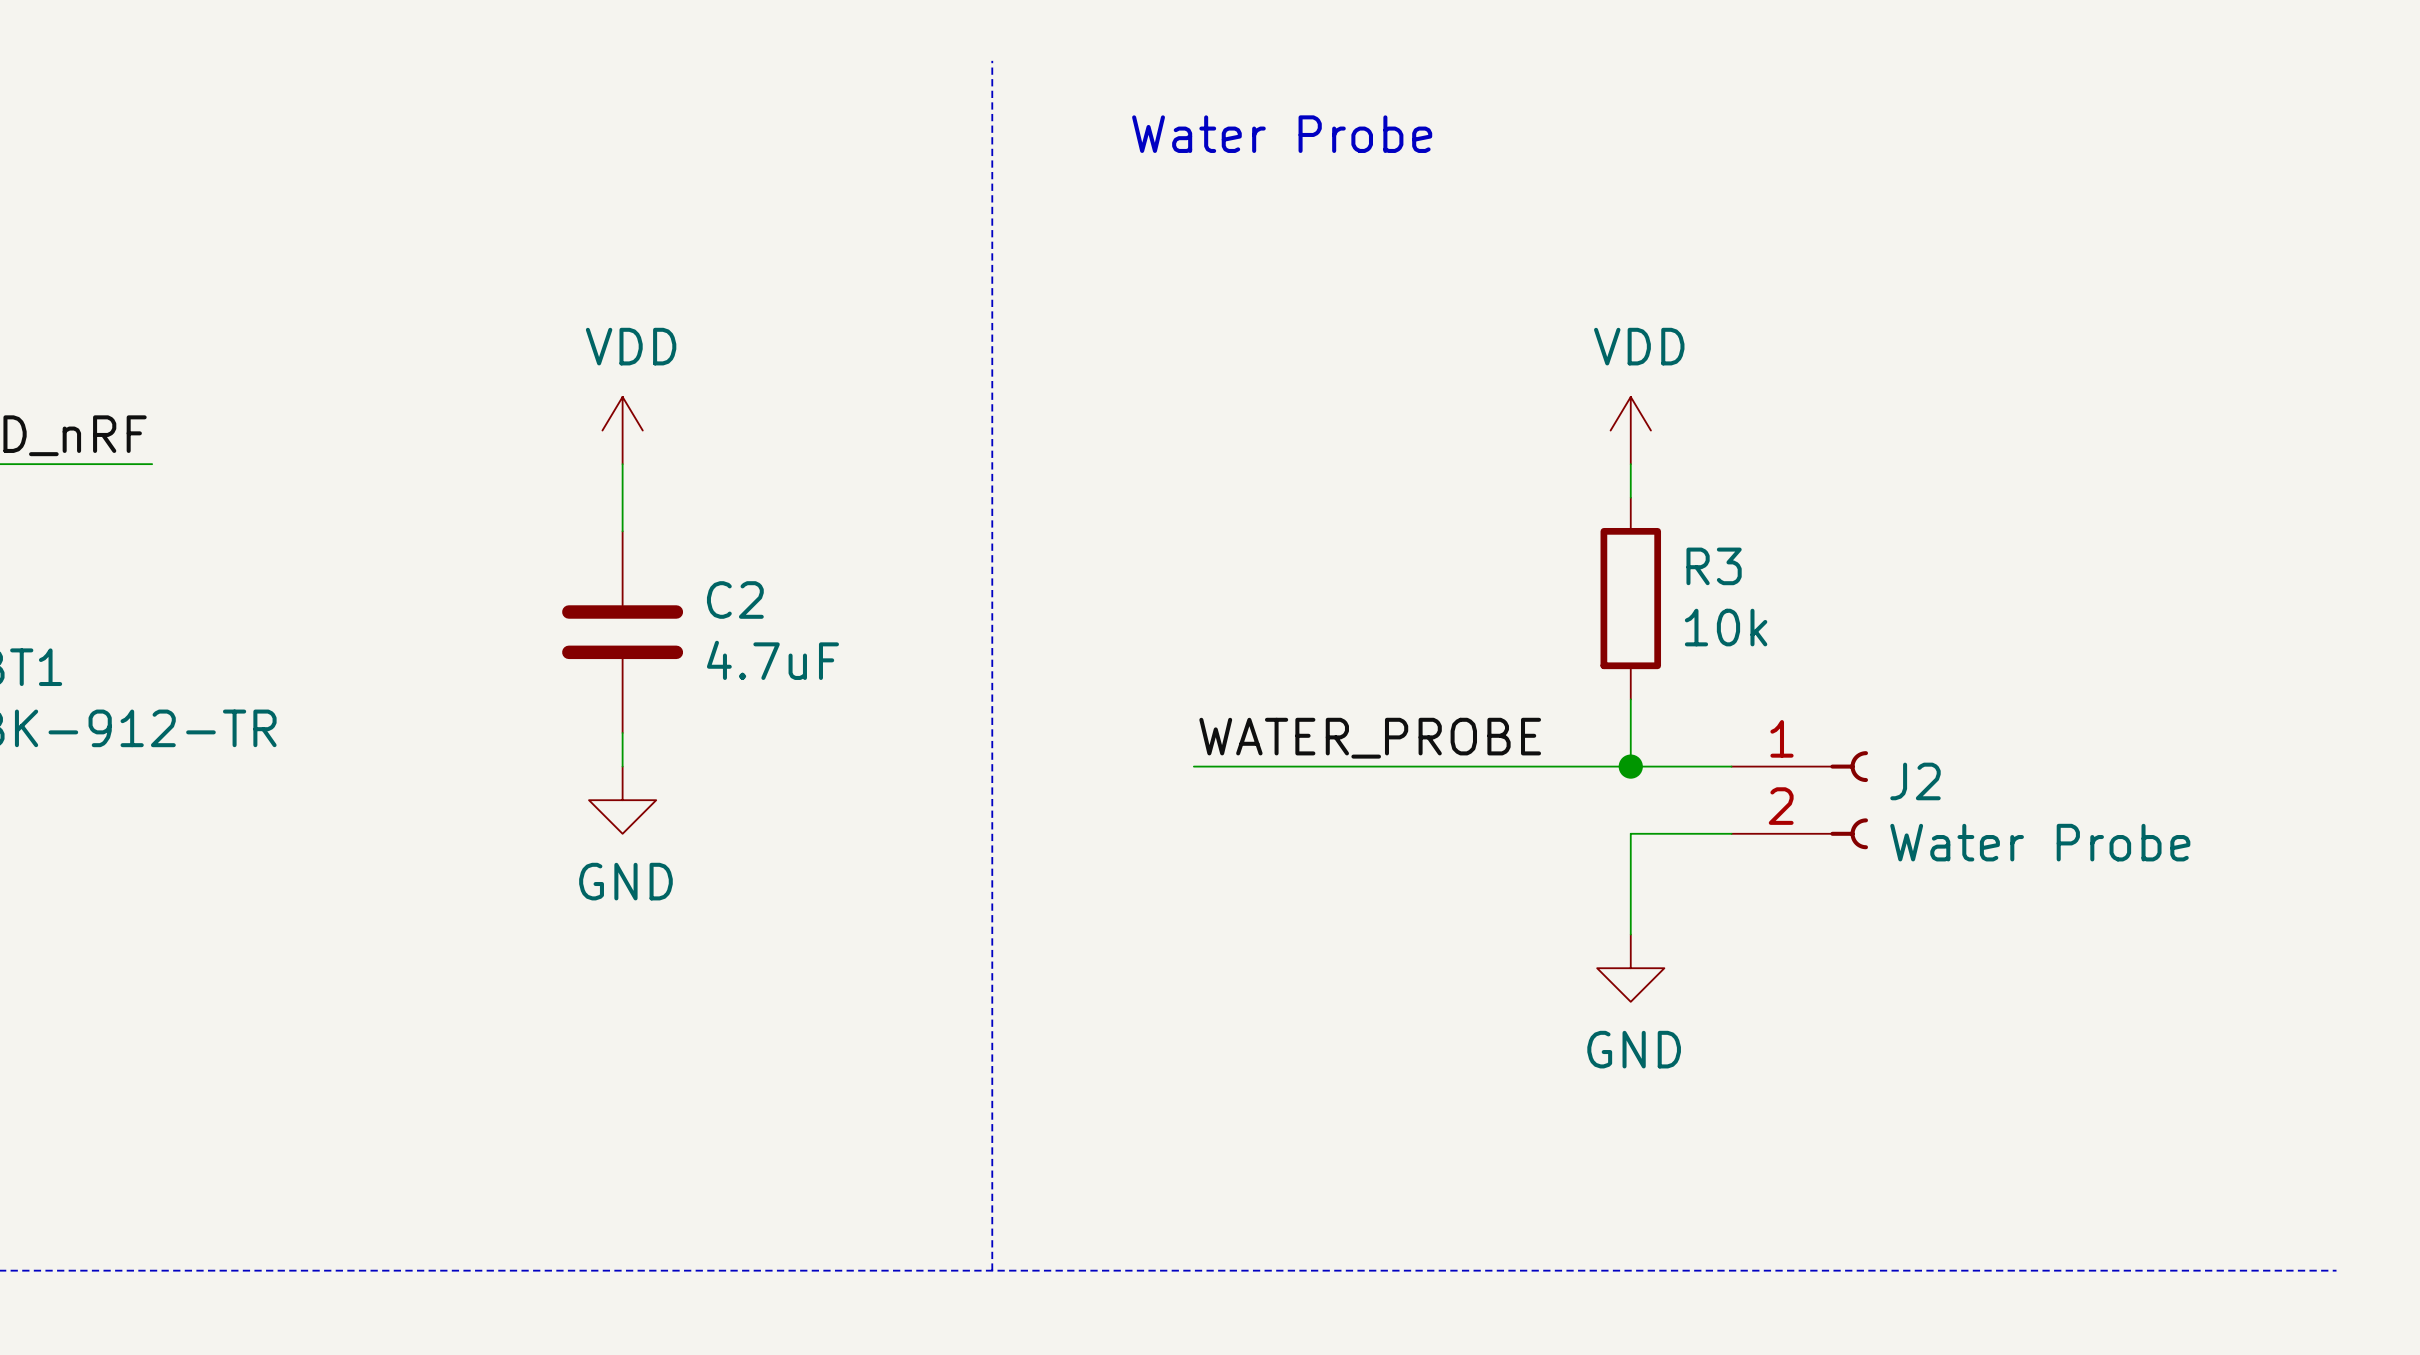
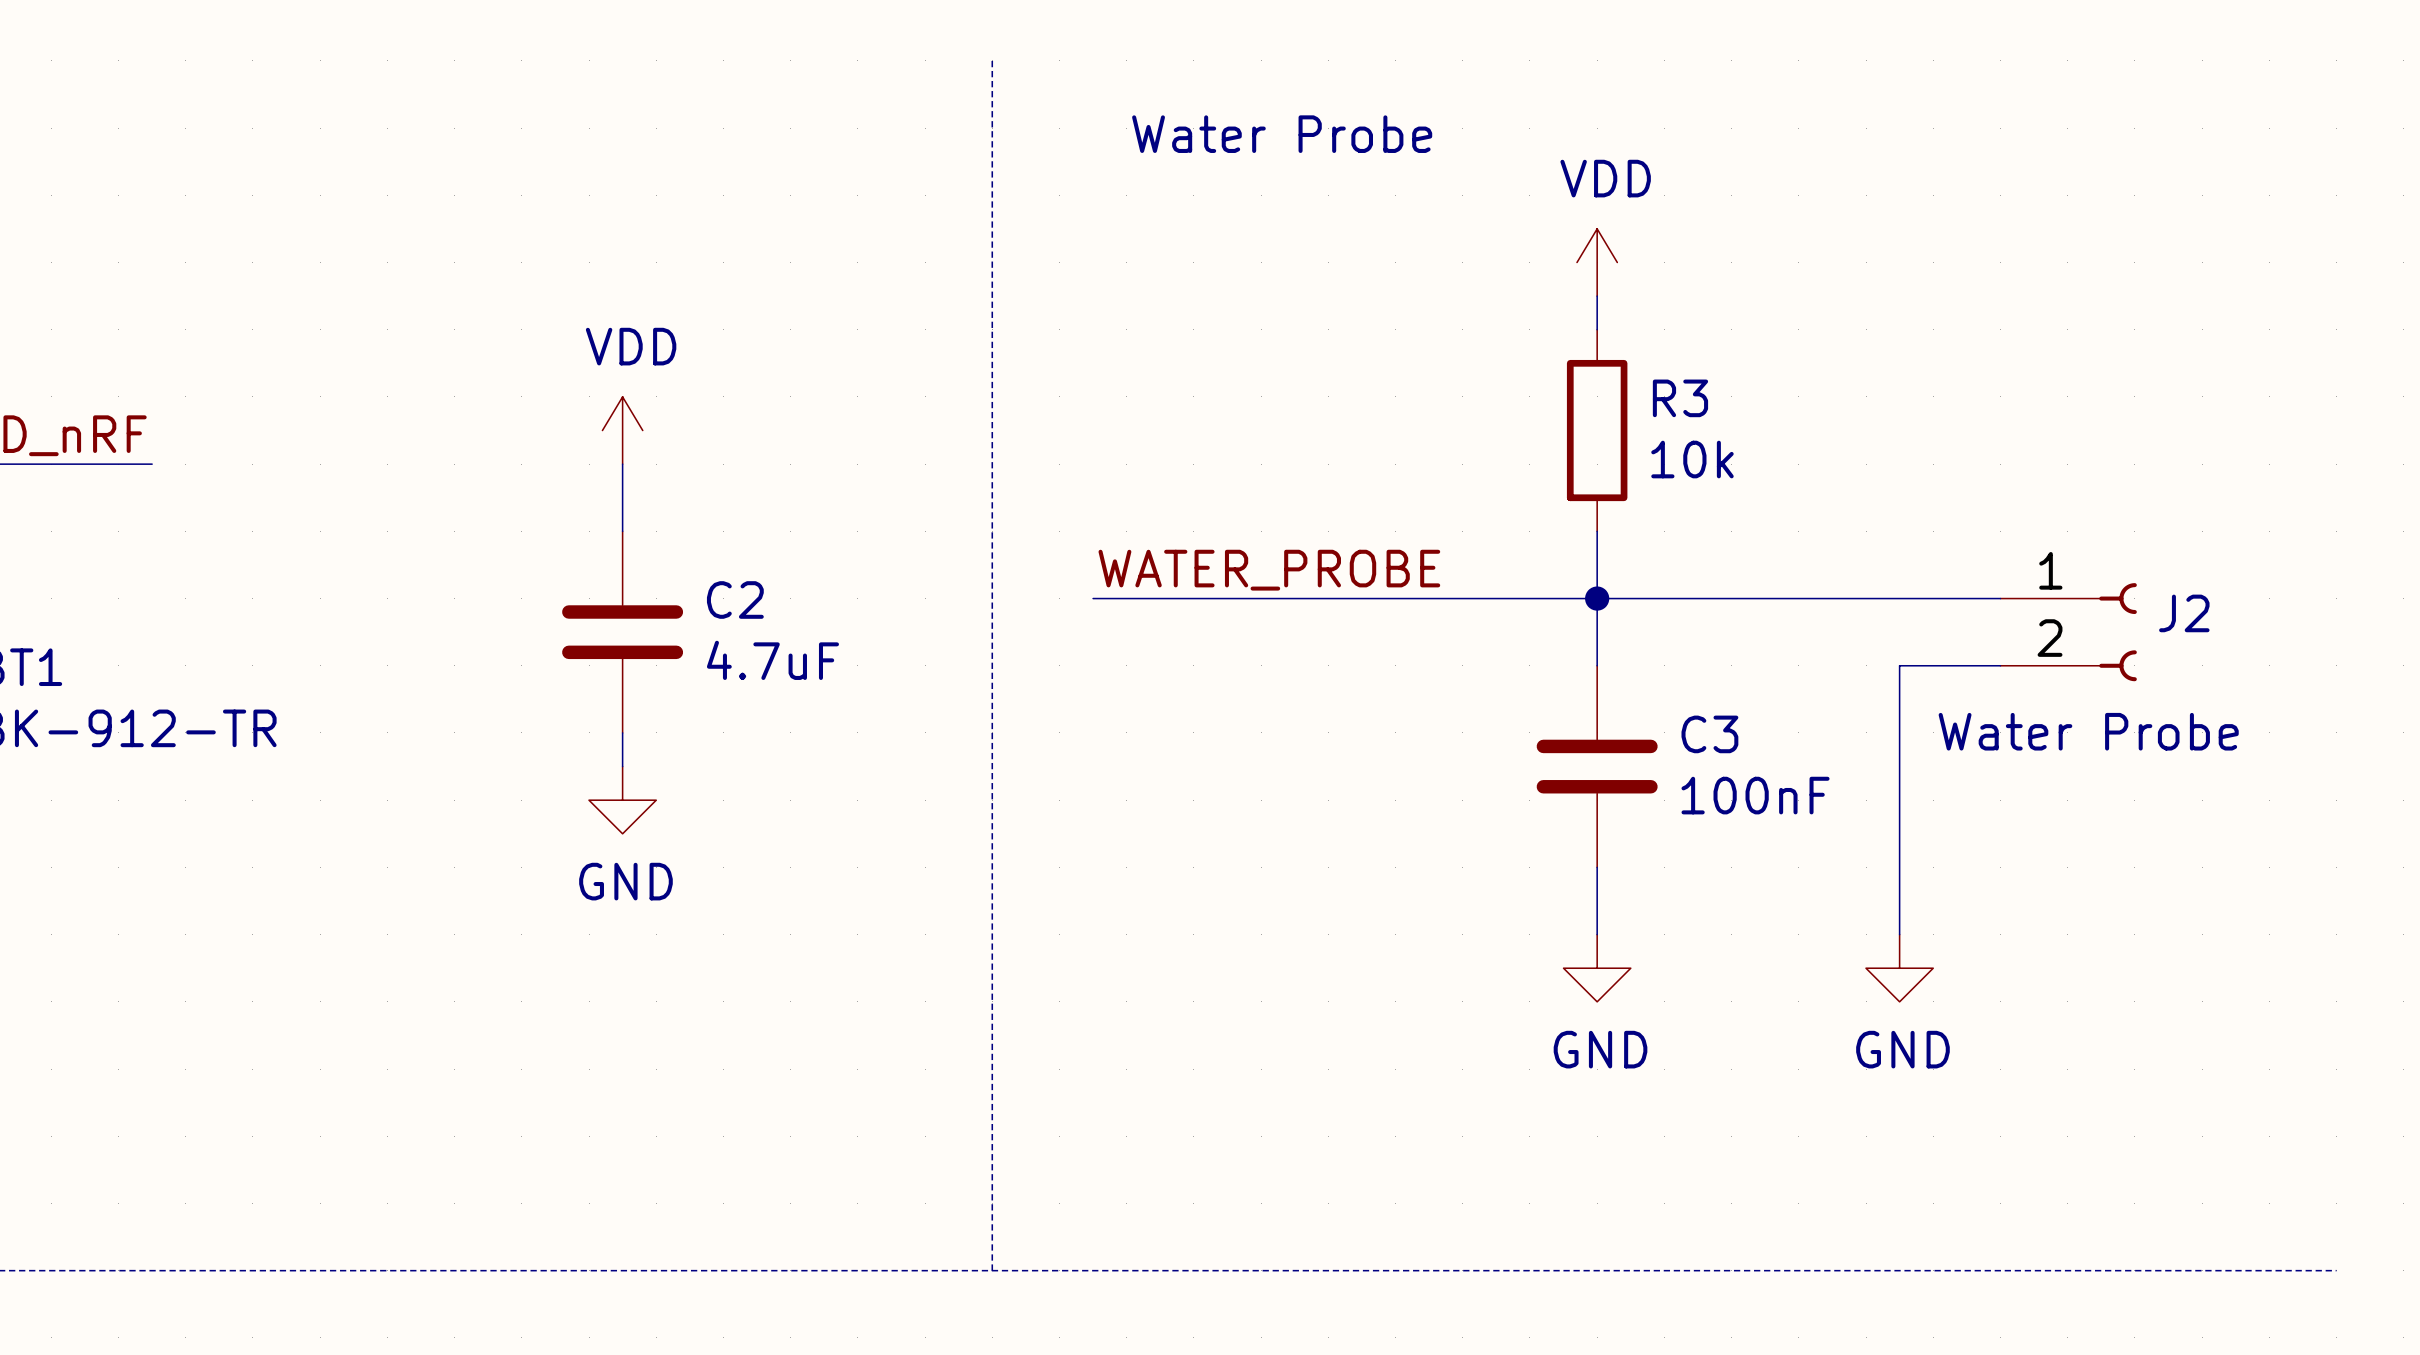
power symbol position: VDD (1630, 430) -> VDD (1597, 262)
wire: (1630, 464) (1630, 497) -> (1597, 296) (1597, 329)
wire: none -> (1597, 531) (1597, 665)
wire: none -> (1093, 598) (2000, 598)
junction: none -> (1597, 598)
R3 position: (1630, 598) -> (1597, 430)
wire: none -> (2000, 665) (1899, 665) (1899, 934)
wire: (1630, 699) (1630, 766) -> (1597, 867) (1597, 934)
label position: WATER_PROBE (1370, 738) -> WATER_PROBE (1269, 570)
wire: (1193, 766) (1731, 766) -> none
C3: none -> 100nF (1597, 766)
junction: (1630, 766) -> none
J2 position: (1799, 800) -> (2068, 632)
wire: (1731, 833) (1630, 833) (1630, 934) -> none
J2 value position: Water Probe (2040, 842) -> Water Probe (2088, 731)
power symbol position: GND (1630, 968) -> GND (1597, 968)
power symbol: none -> GND (1899, 968)

